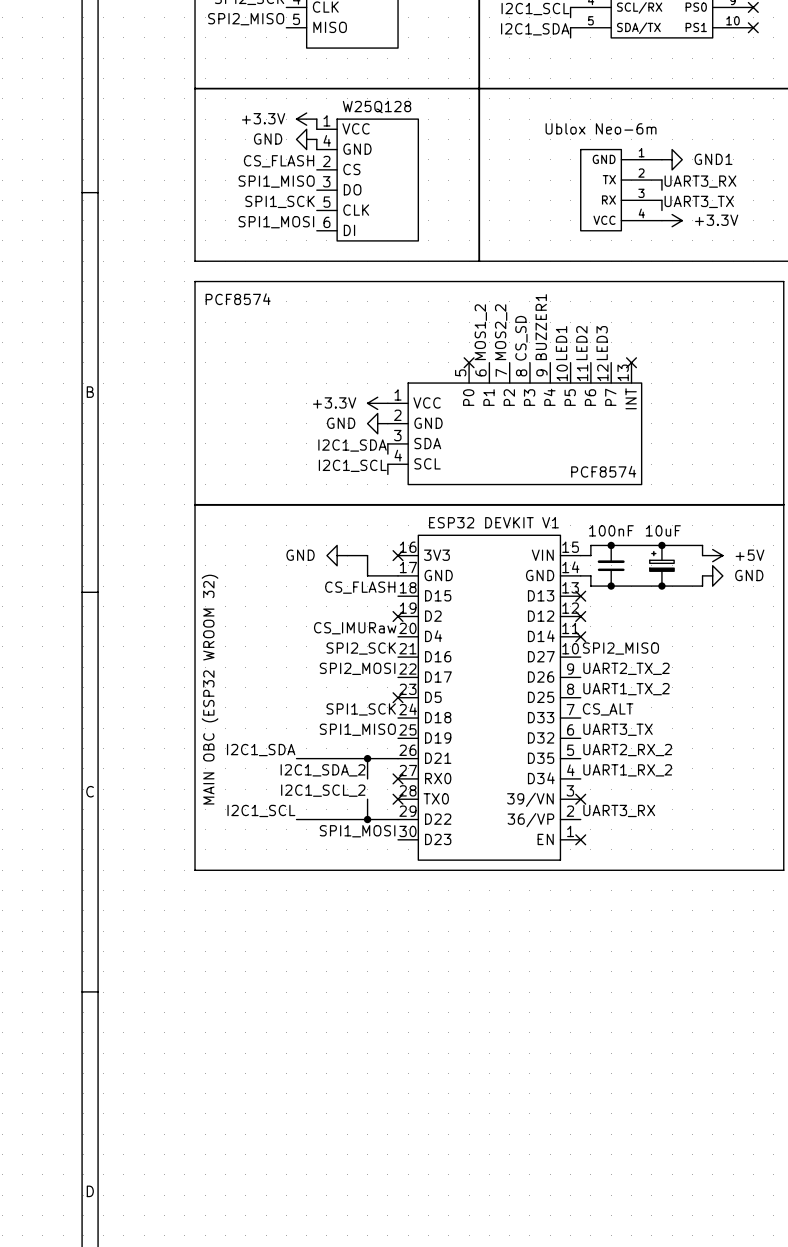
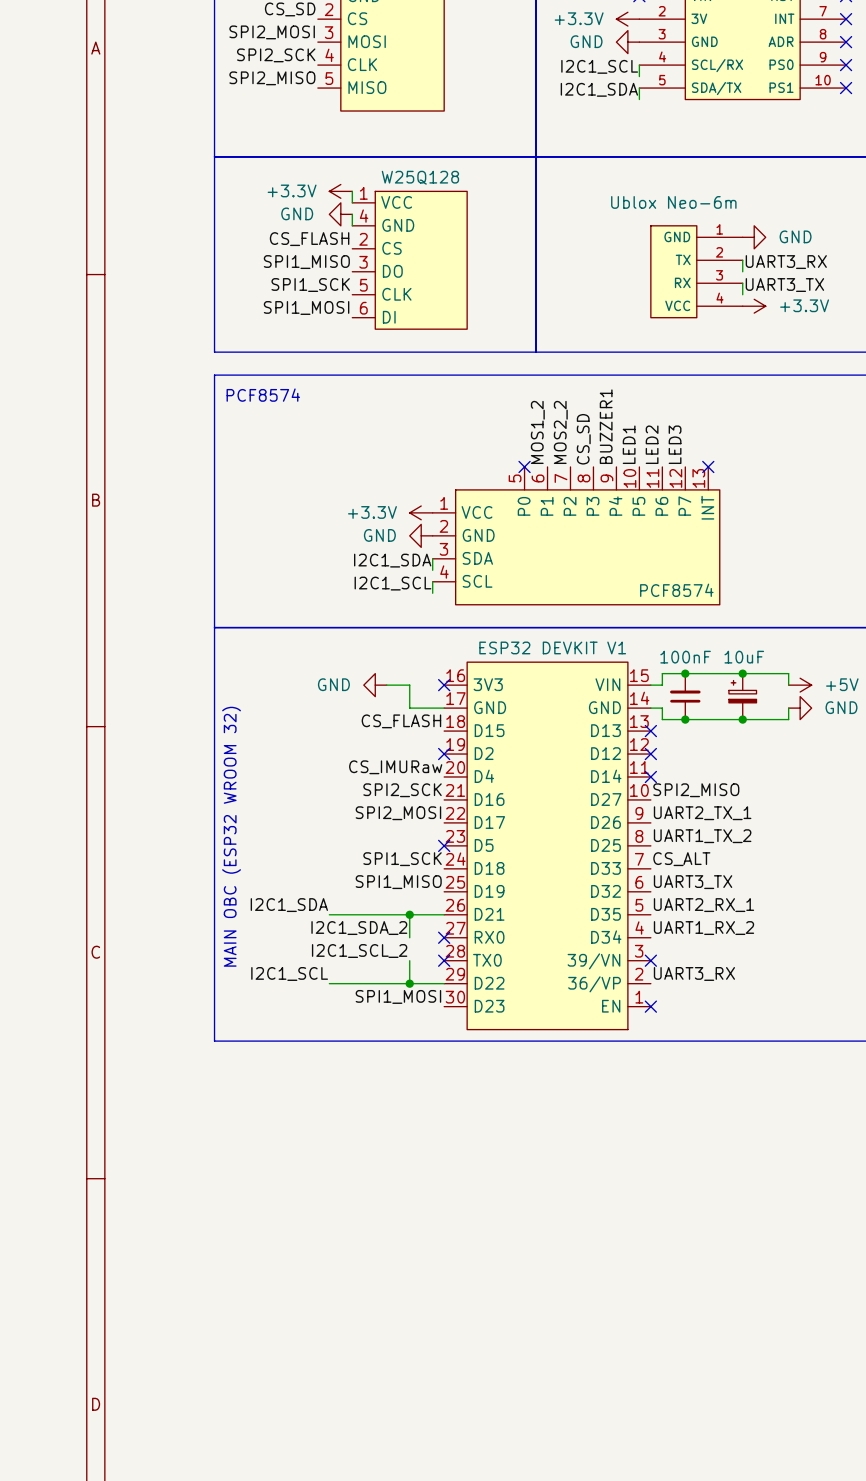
power symbol: GND1 (672, 159) -> GND (754, 237)
label: UART2_TX_2 (626, 668) -> UART2_TX_1 (702, 813)
label: UART2_RX_2 (627, 750) -> UART2_RX_1 (703, 905)

